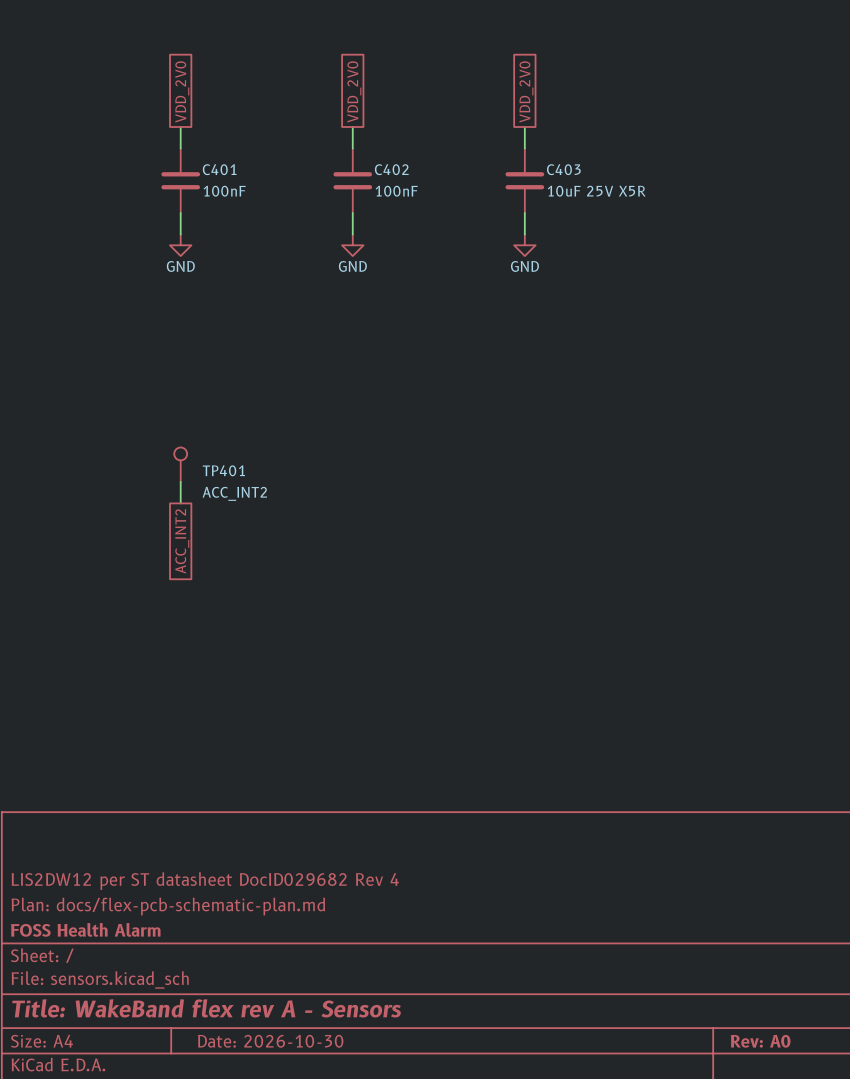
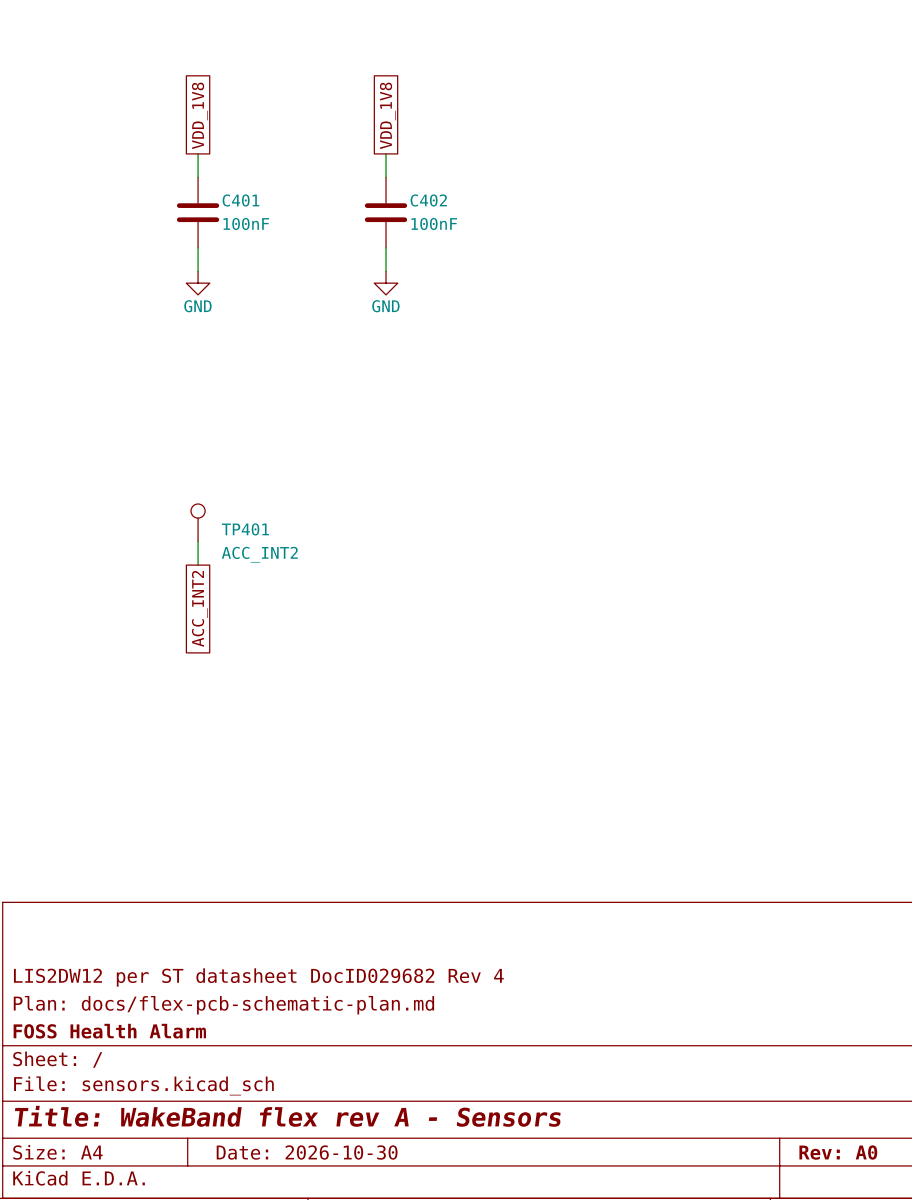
global label: VDD_2V0 (182, 91) -> VDD_1V8 (199, 115)
global label: VDD_2V0 (354, 91) -> VDD_1V8 (387, 115)
global label: VDD_2V0 (526, 91) -> none
wire: (524, 127) (524, 148) -> none
C403: 10uF 25V X5R (524, 180) -> none
wire: (524, 213) (524, 234) -> none
power symbol: GND (524, 245) -> none

